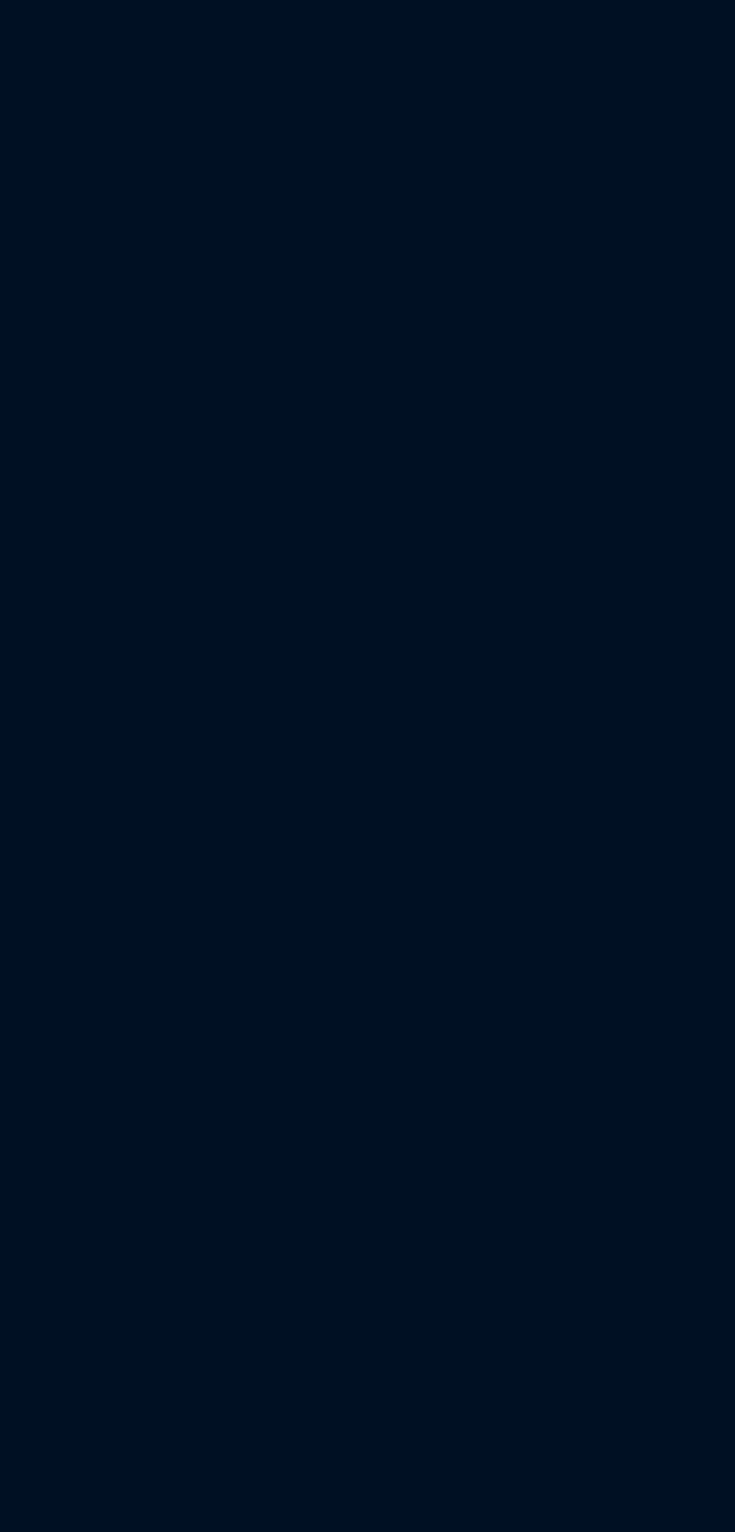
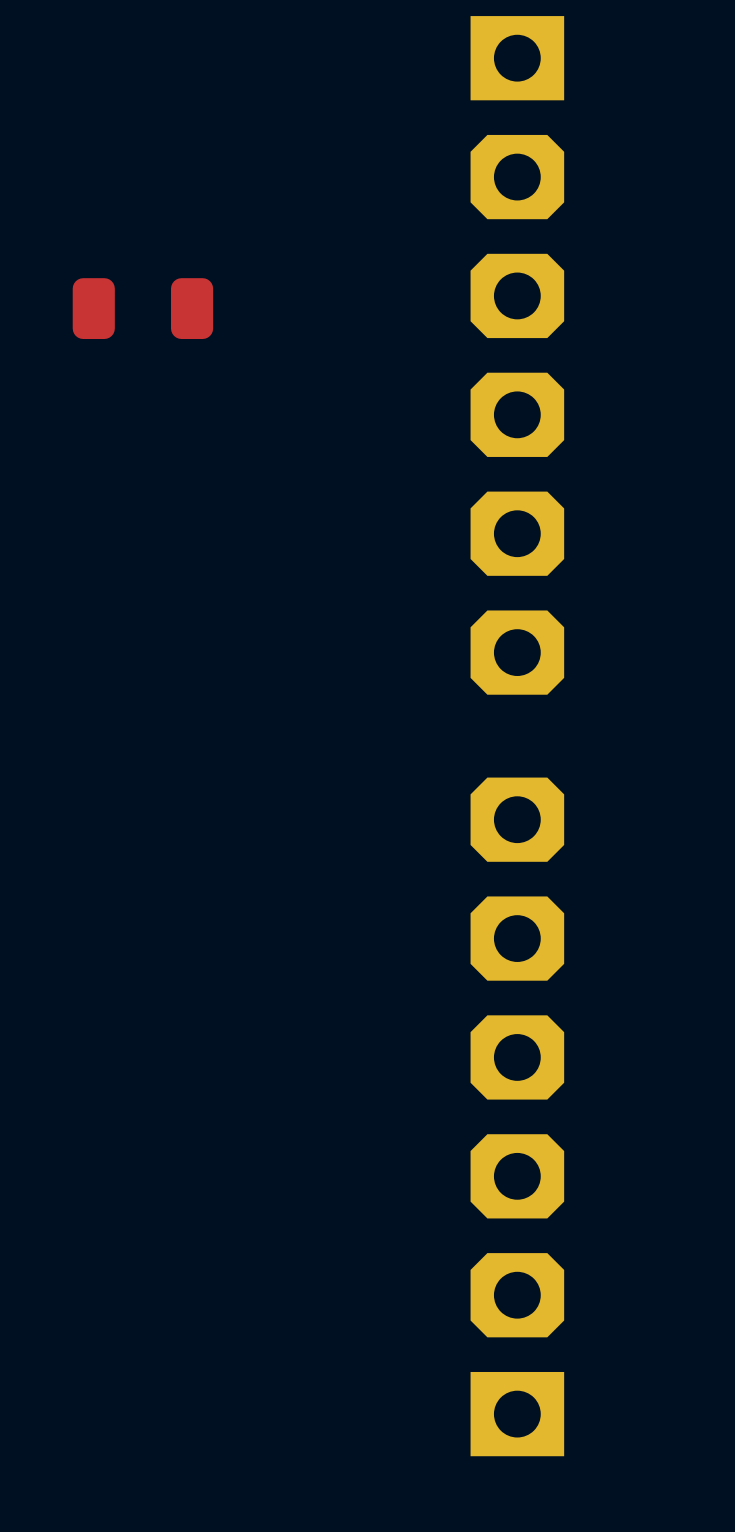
part: none -> (142, 308)
part: none -> (517, 355)
part: none -> (517, 1116)

